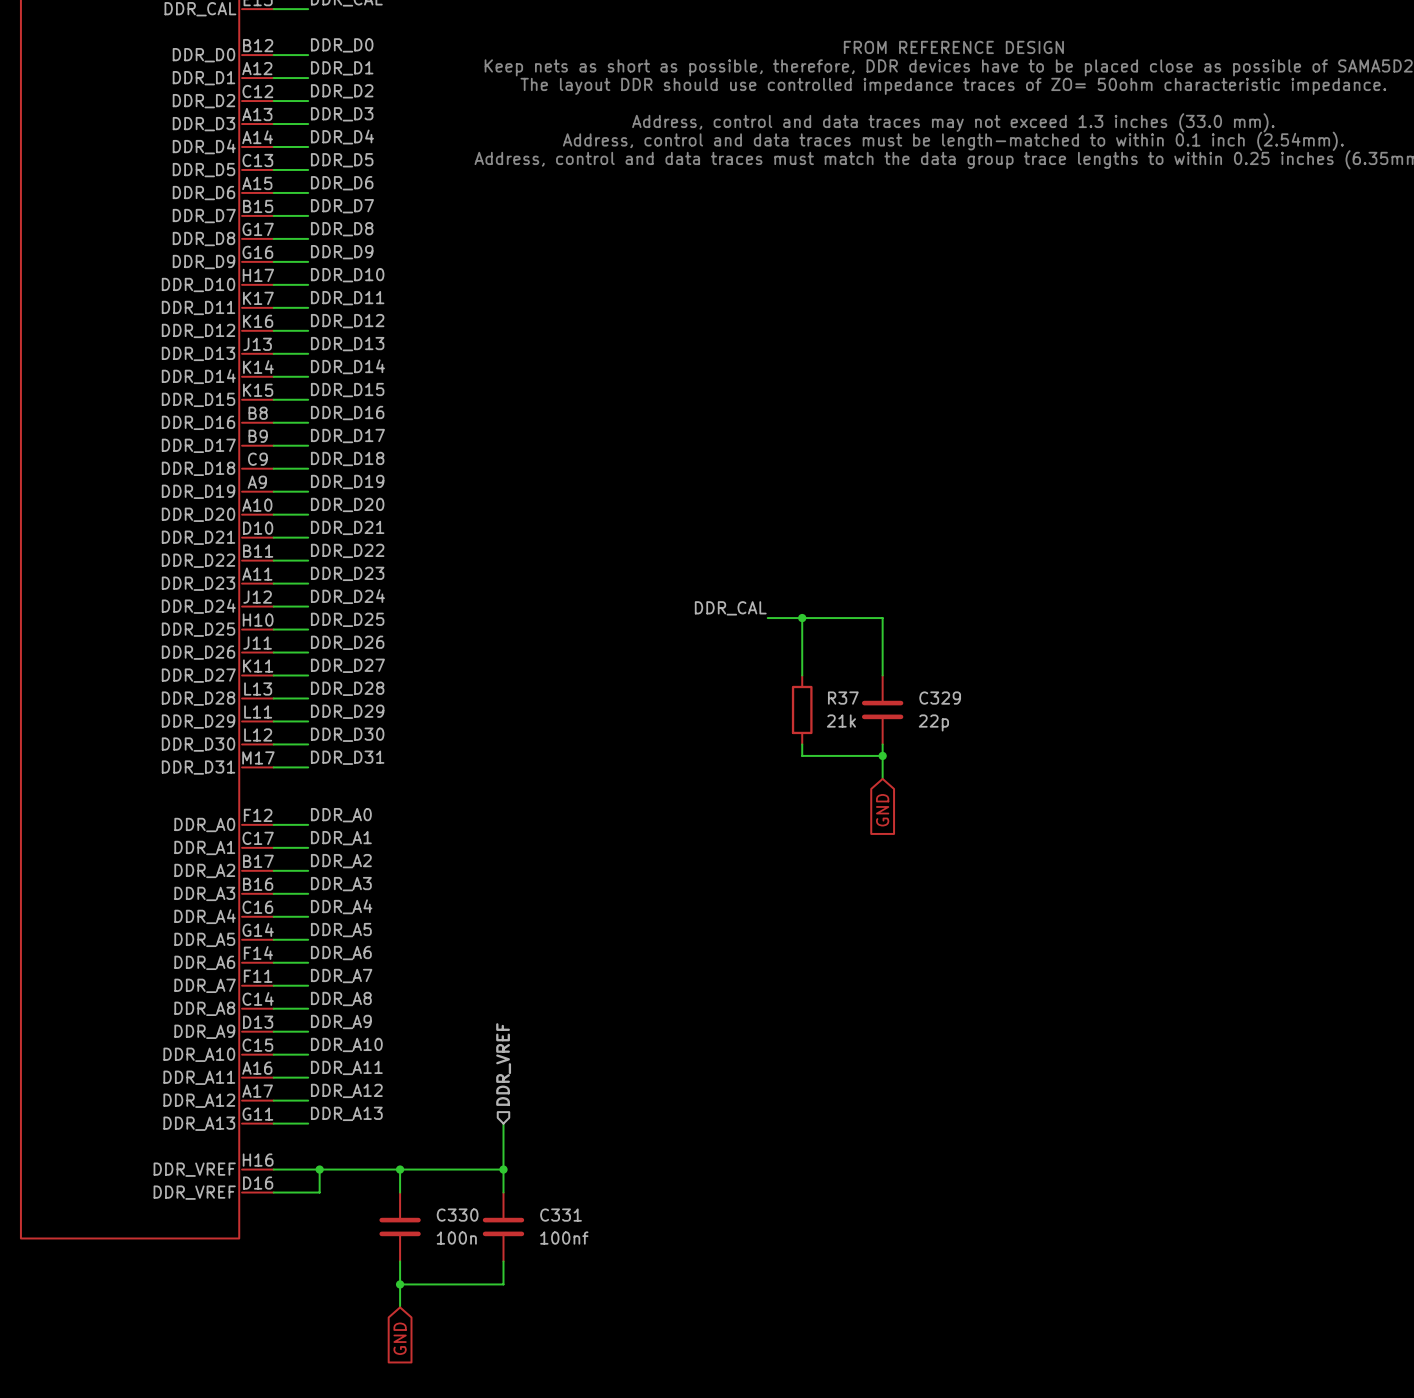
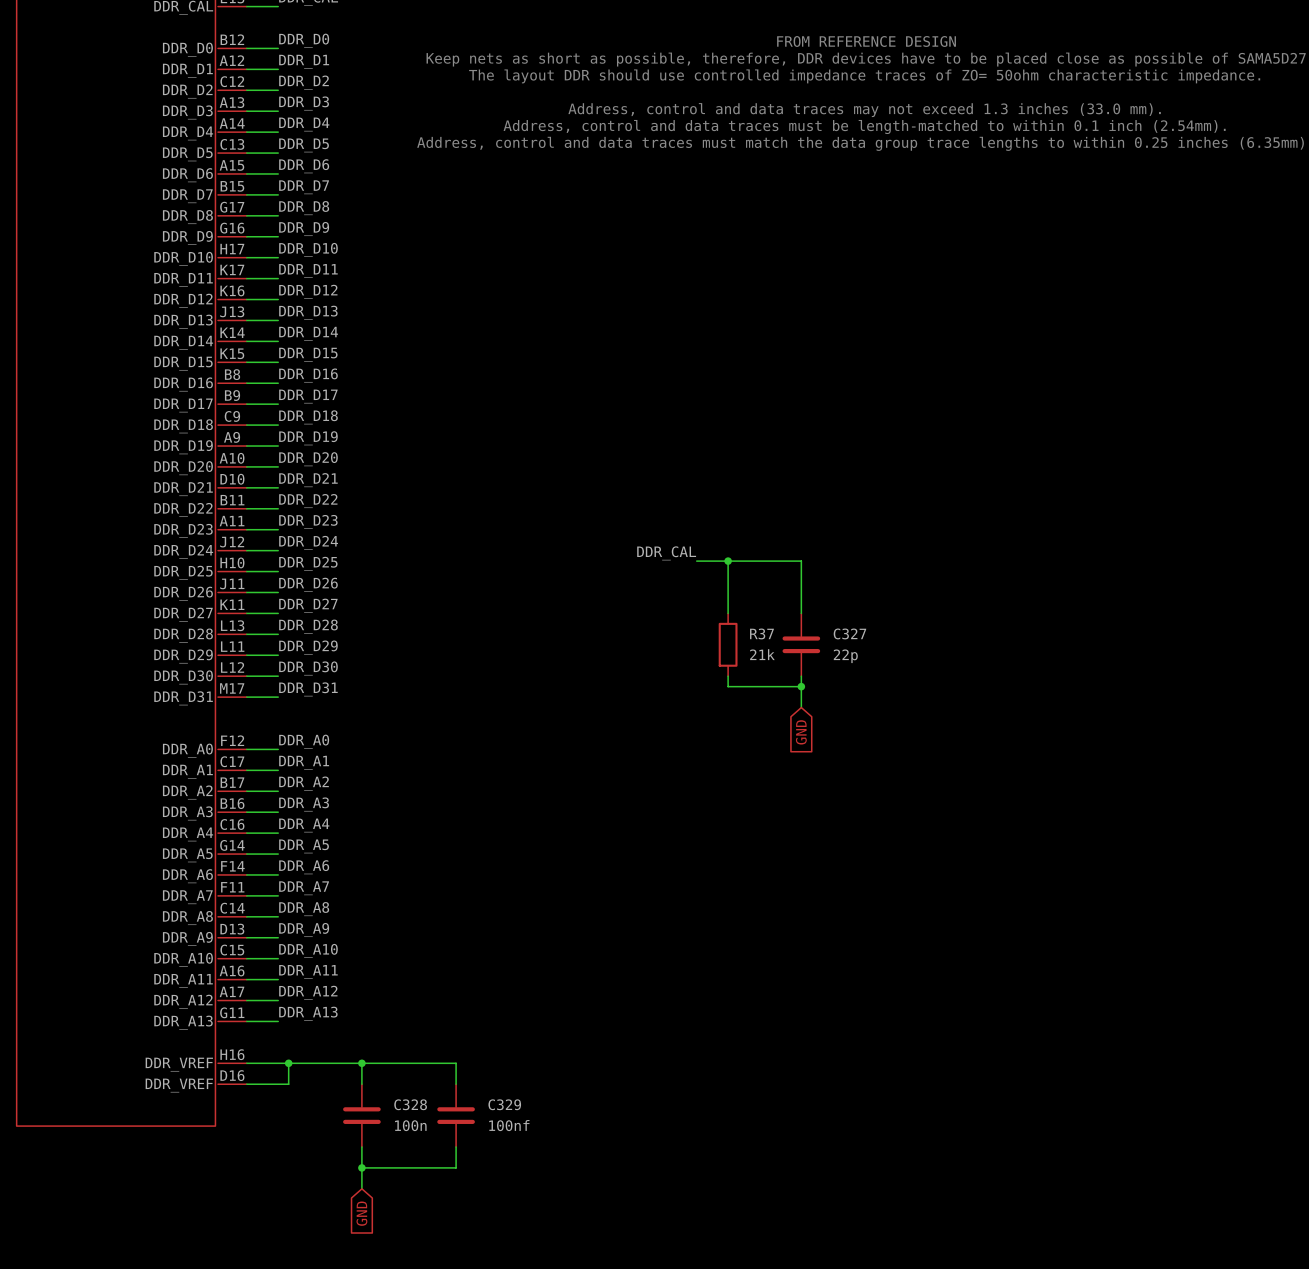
C329 name: C329 (940, 698) -> C327 (849, 633)
hierarchical label: DDR_VREF (503, 1064) -> none
wire: (503, 1123) (503, 1169) -> none
junction: (503, 1169) -> none
C330 name: C330 (457, 1215) -> C328 (410, 1104)
C331 name: C331 (561, 1215) -> C329 (504, 1104)

